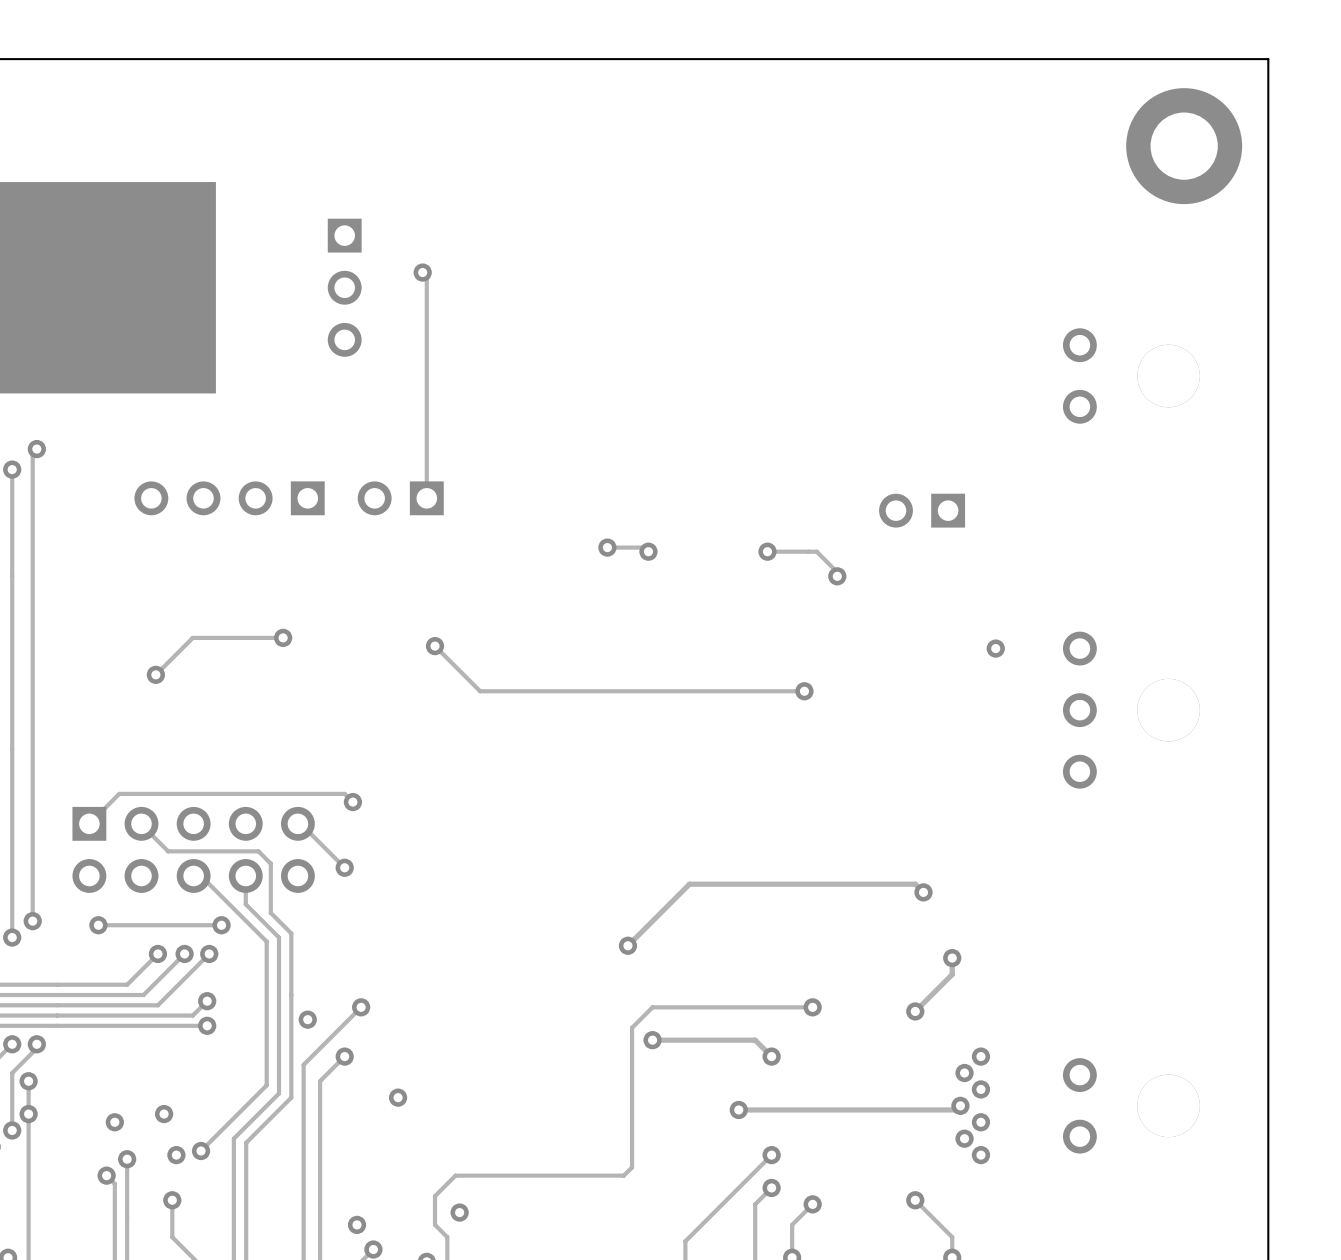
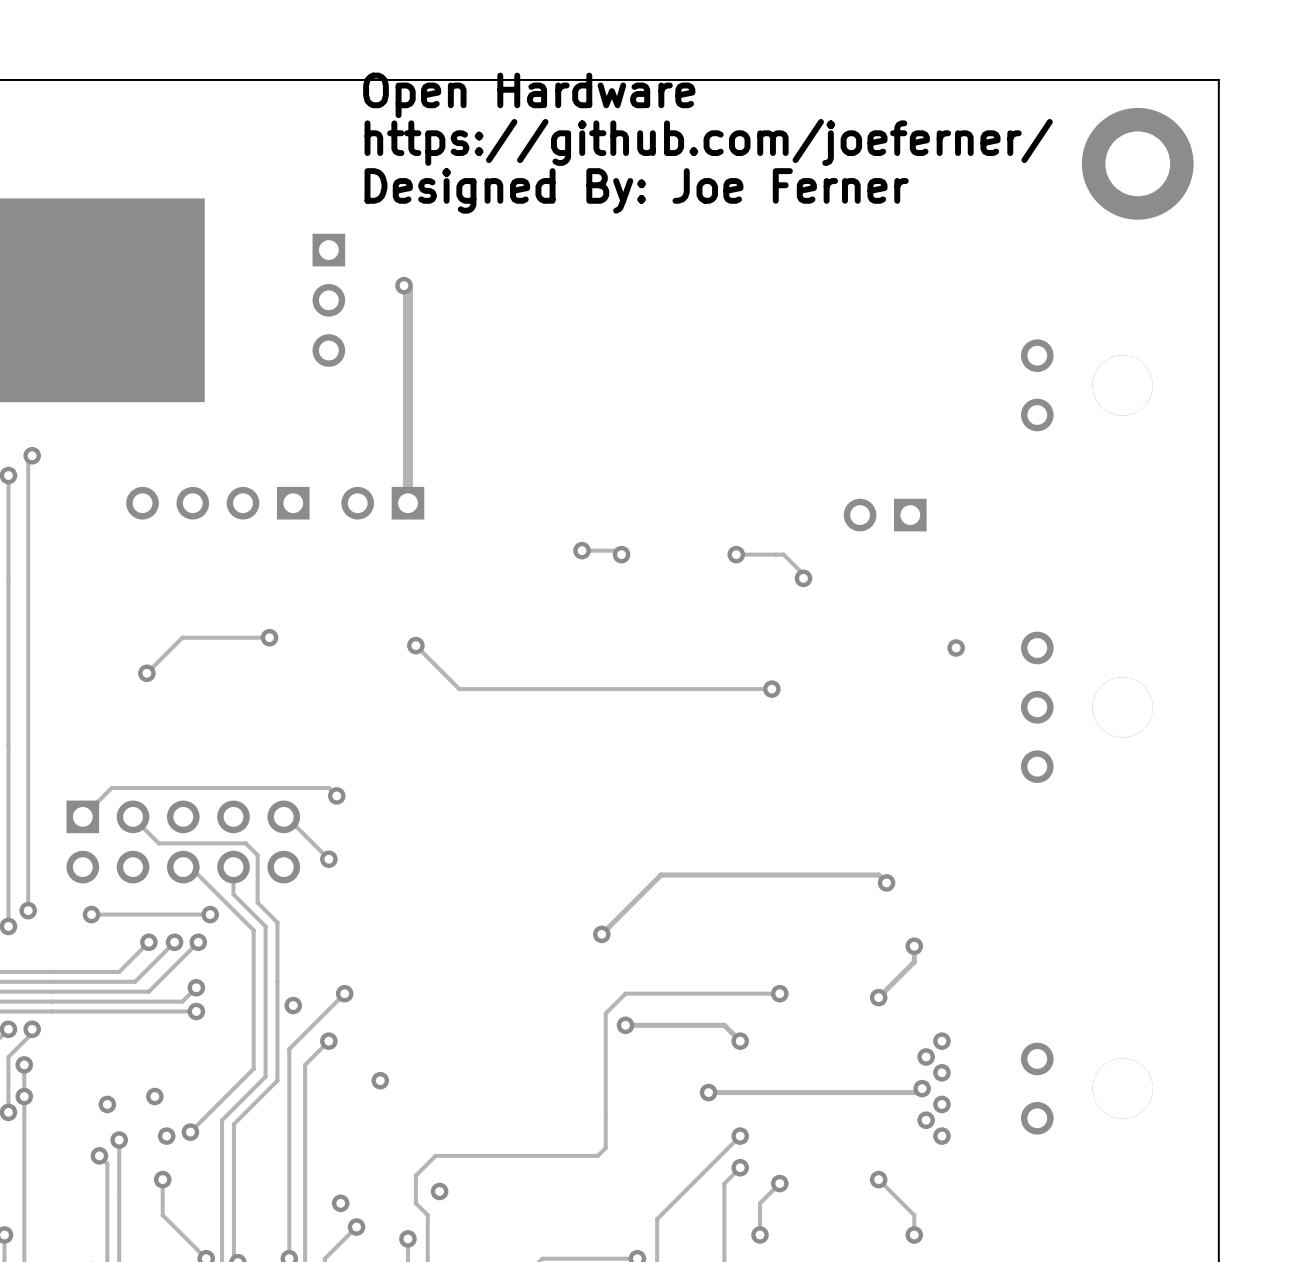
text: none -> Open Hardware (529, 95)
text: none -> https://github.com/joeferner/ (708, 142)
text: none -> Designed By: Joe Ferner (636, 190)
track width: thin (422, 272) (426, 276) (426, 498) -> thick (404, 285) (407, 289) (407, 503)

